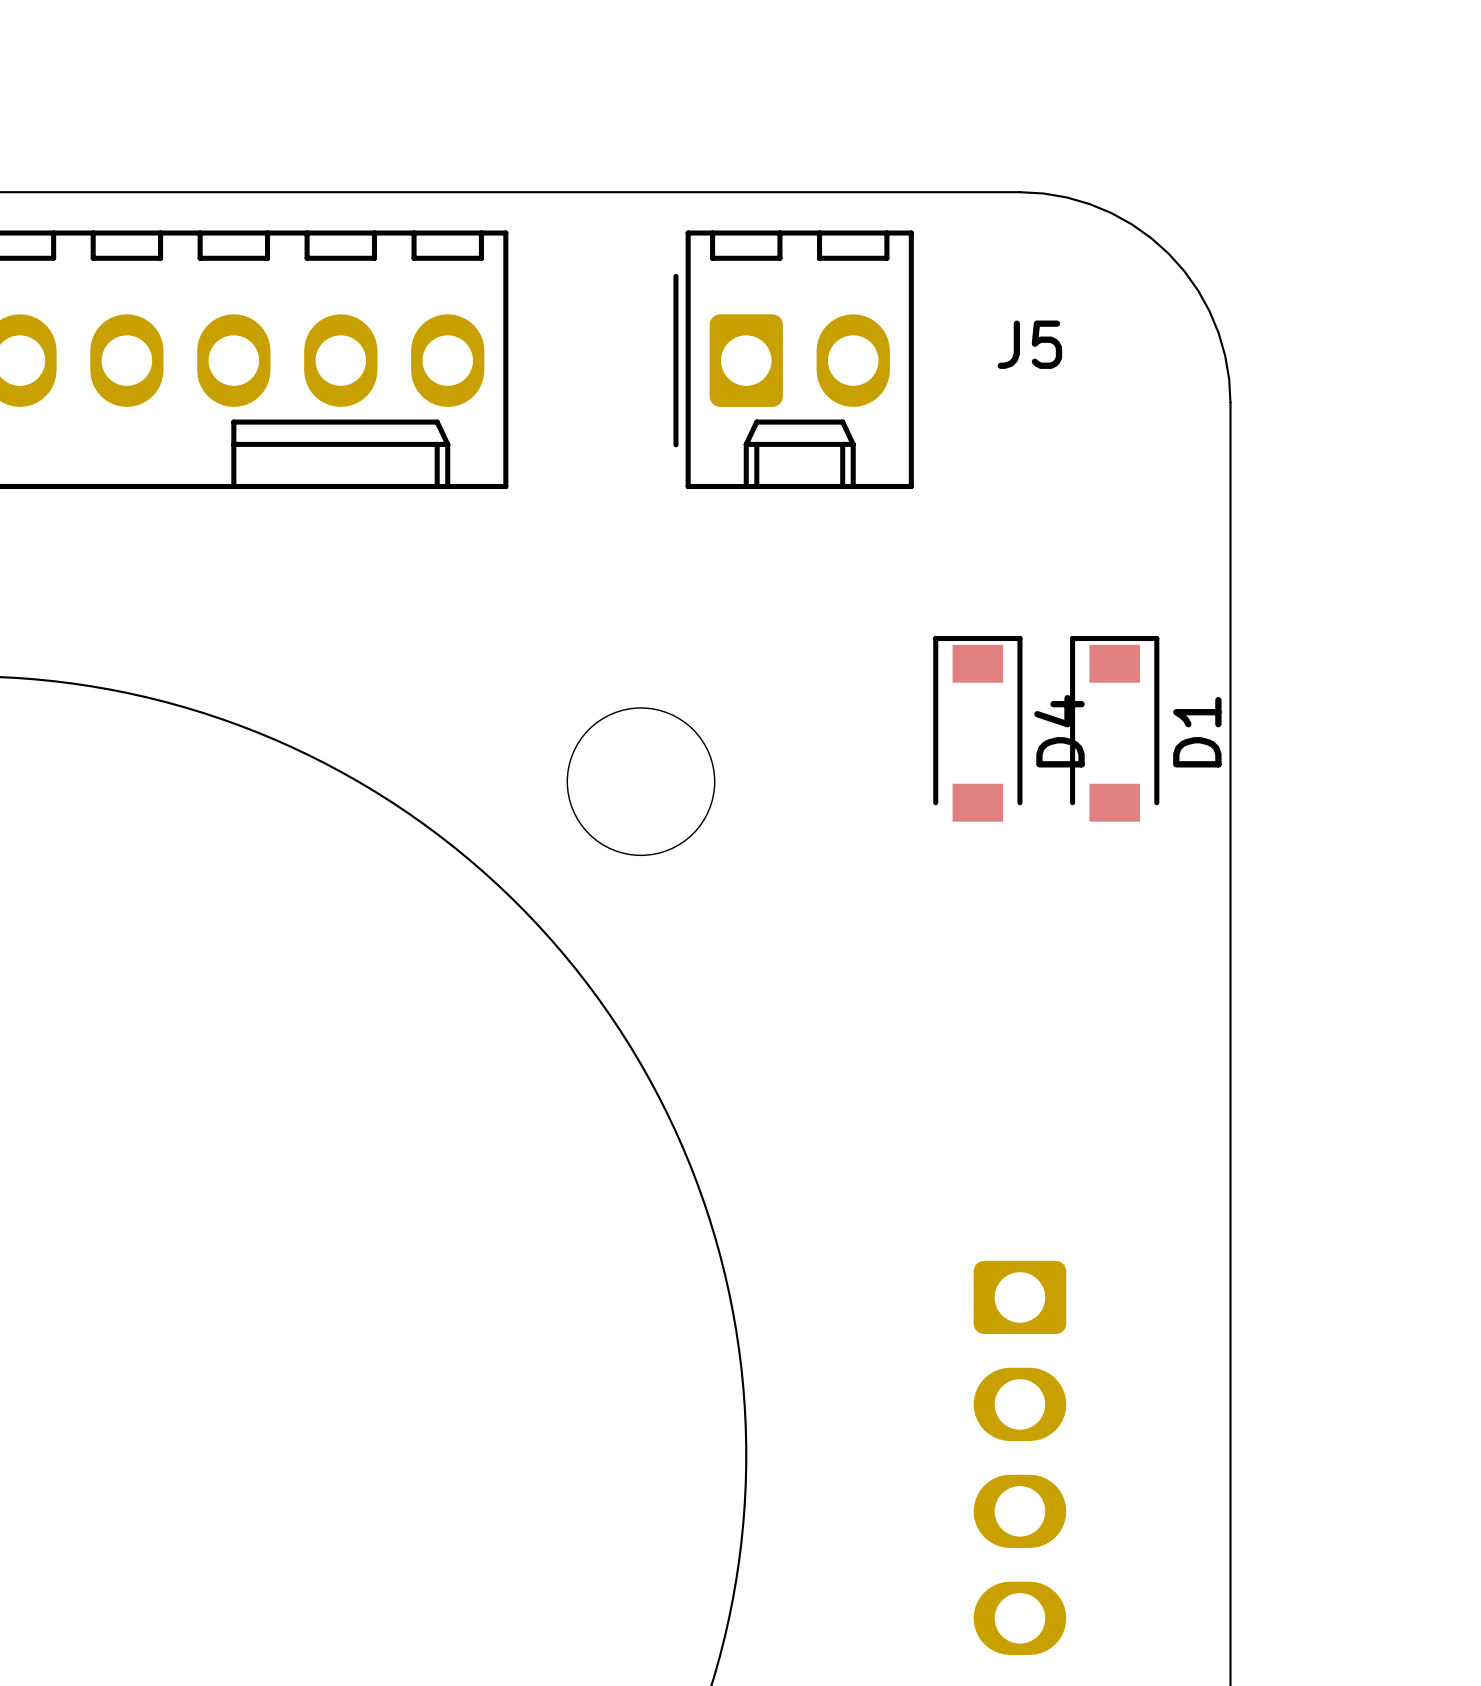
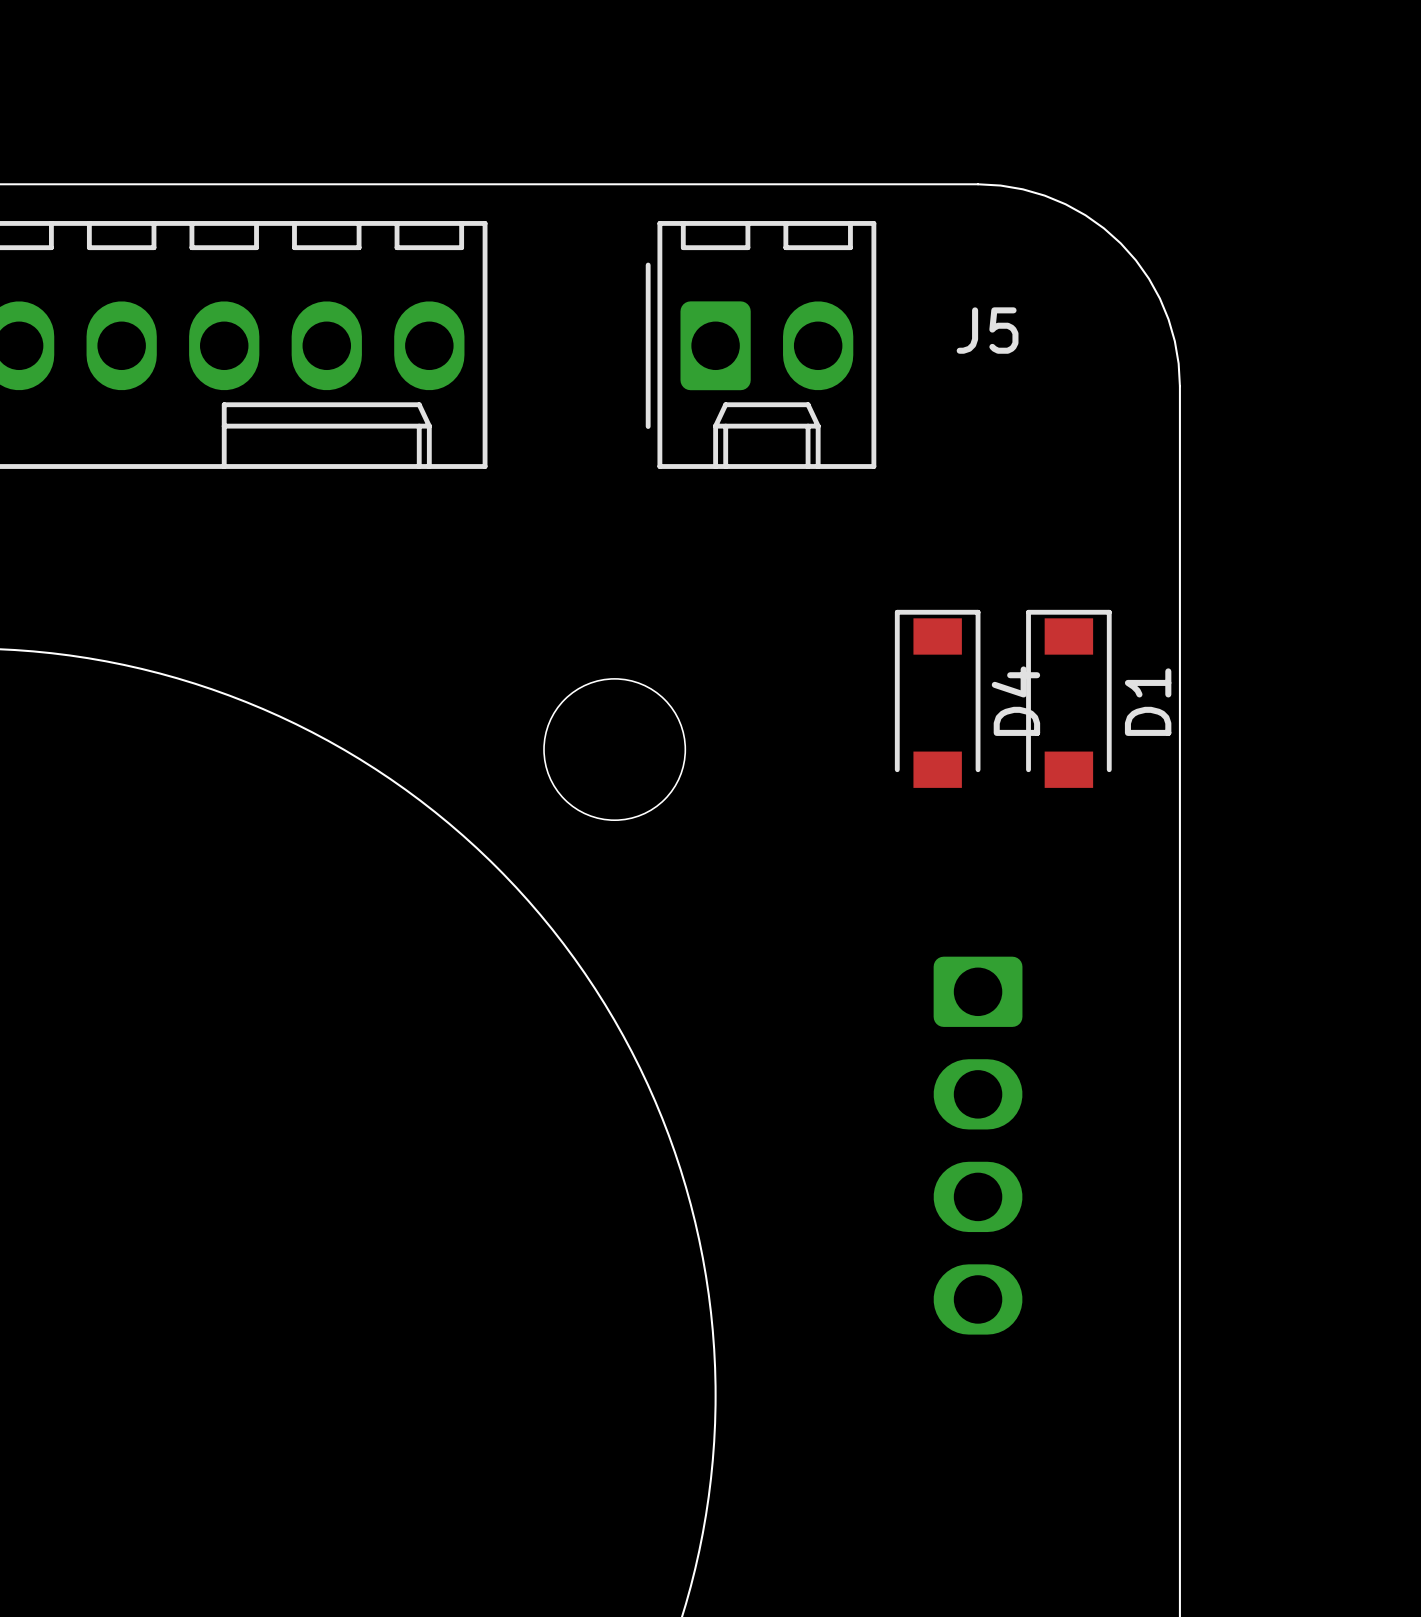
part position: (1019, 1457) -> (978, 1145)

